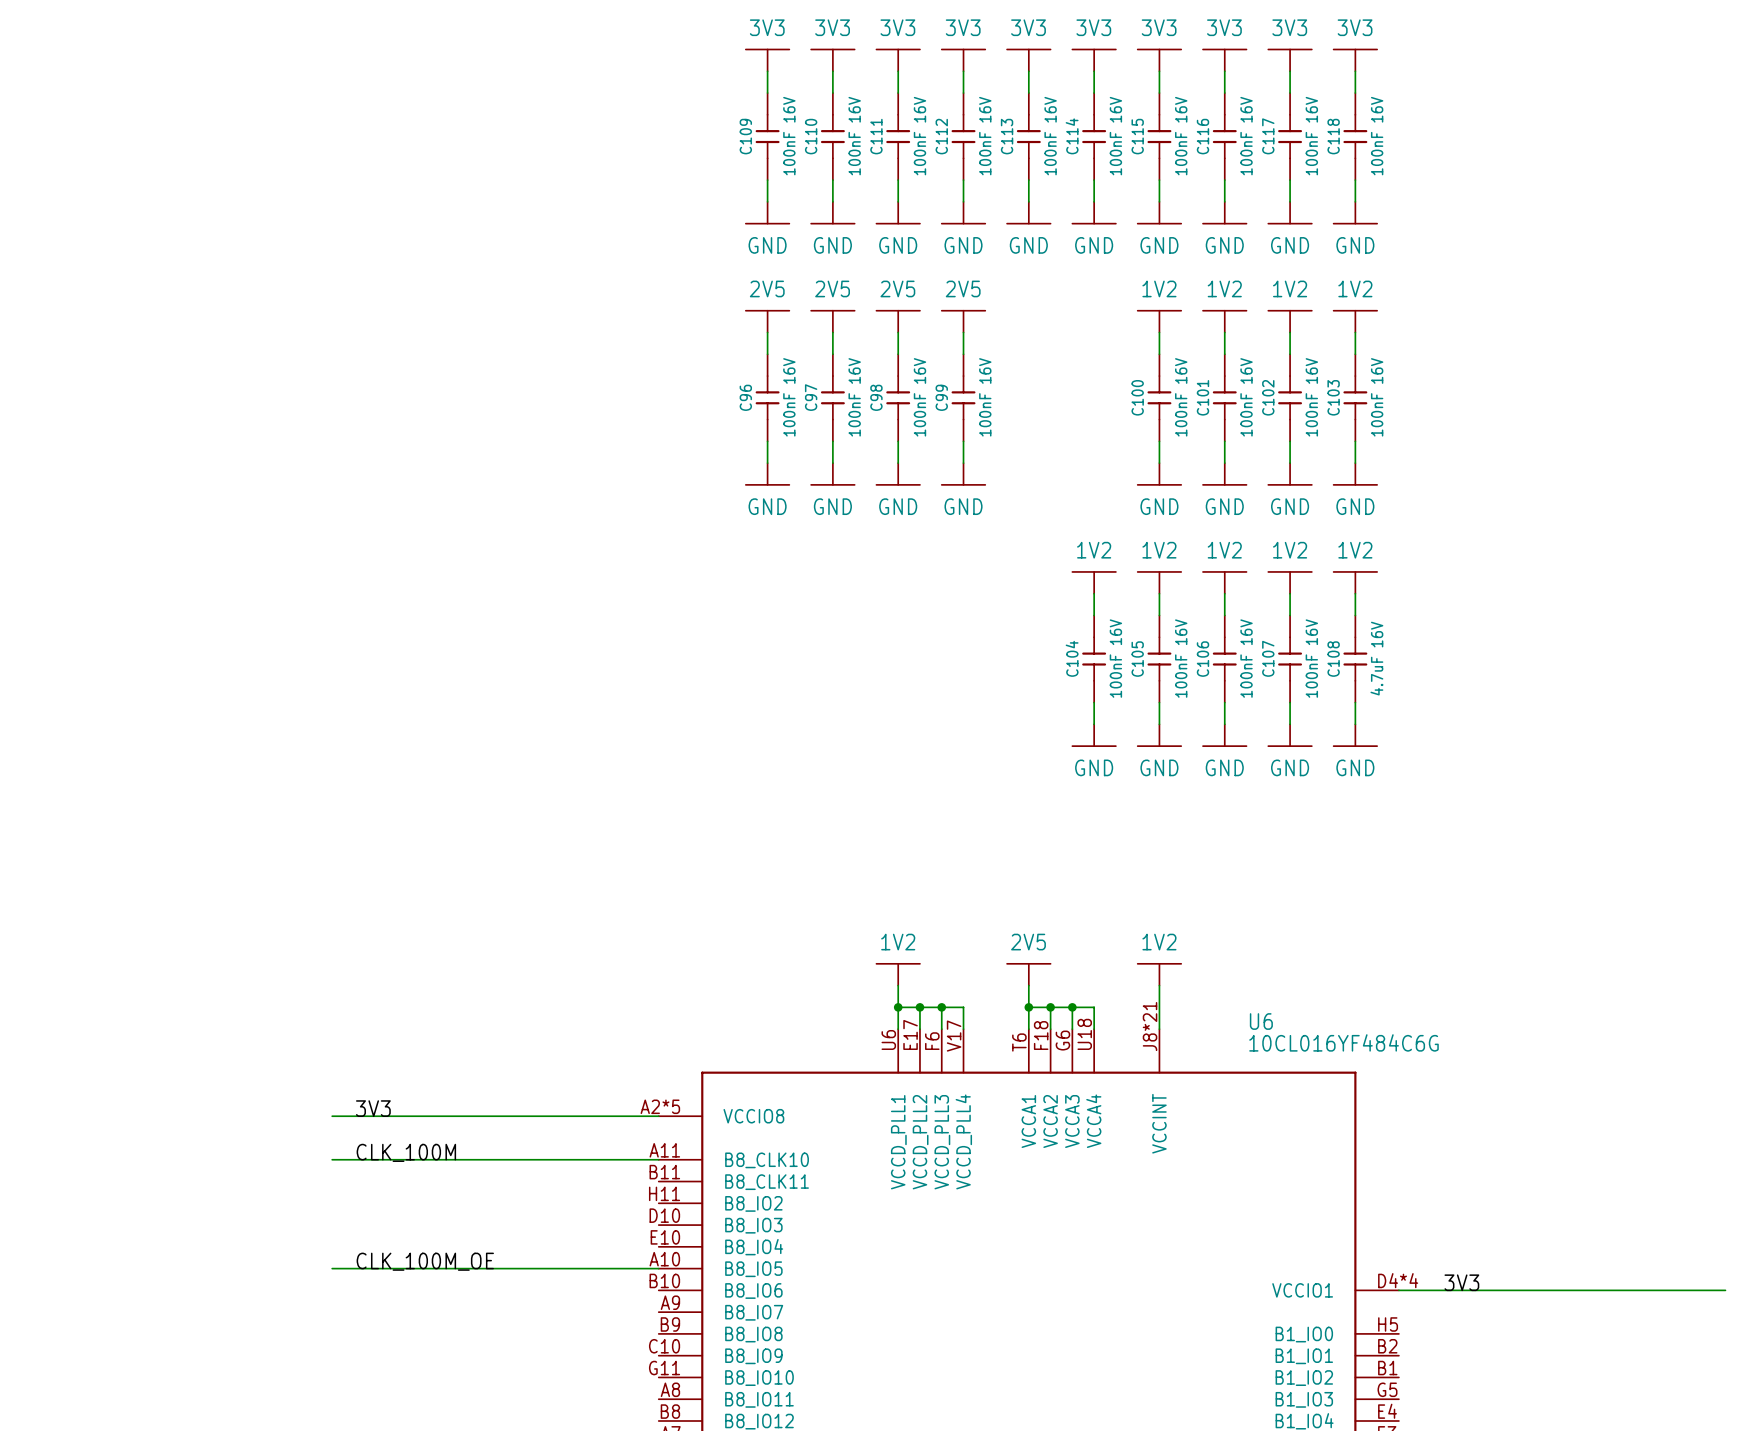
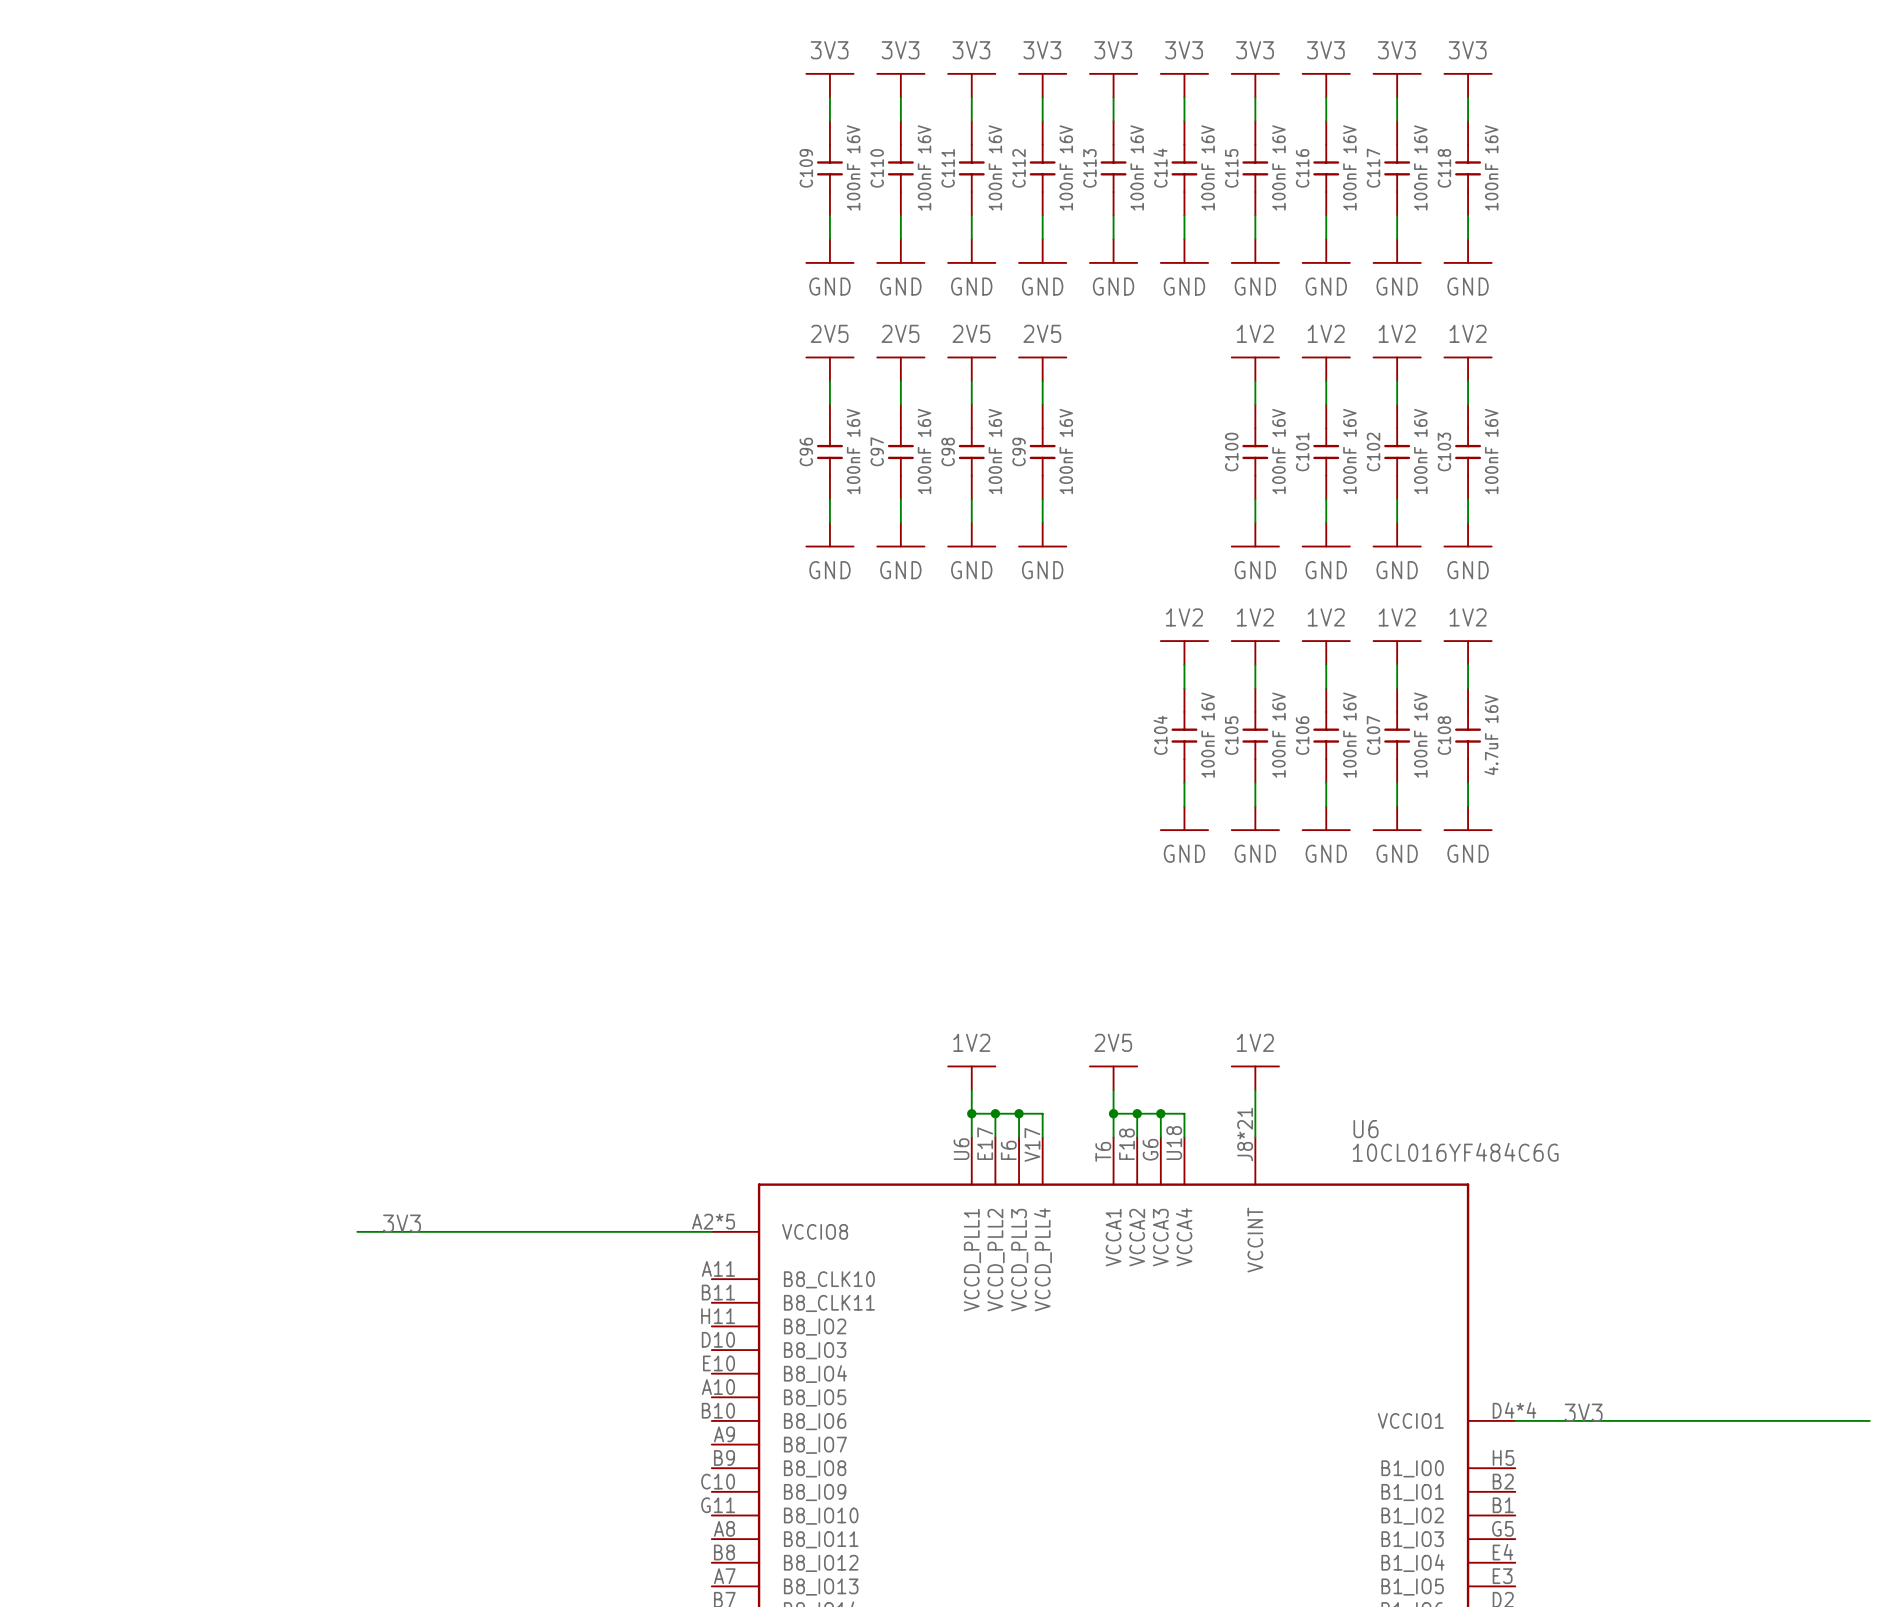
label: CLK_100M (406, 1152) -> none
wire: (332, 1159) (658, 1159) -> none
label: CLK_100M_OE (425, 1261) -> none
wire: (332, 1268) (658, 1268) -> none

